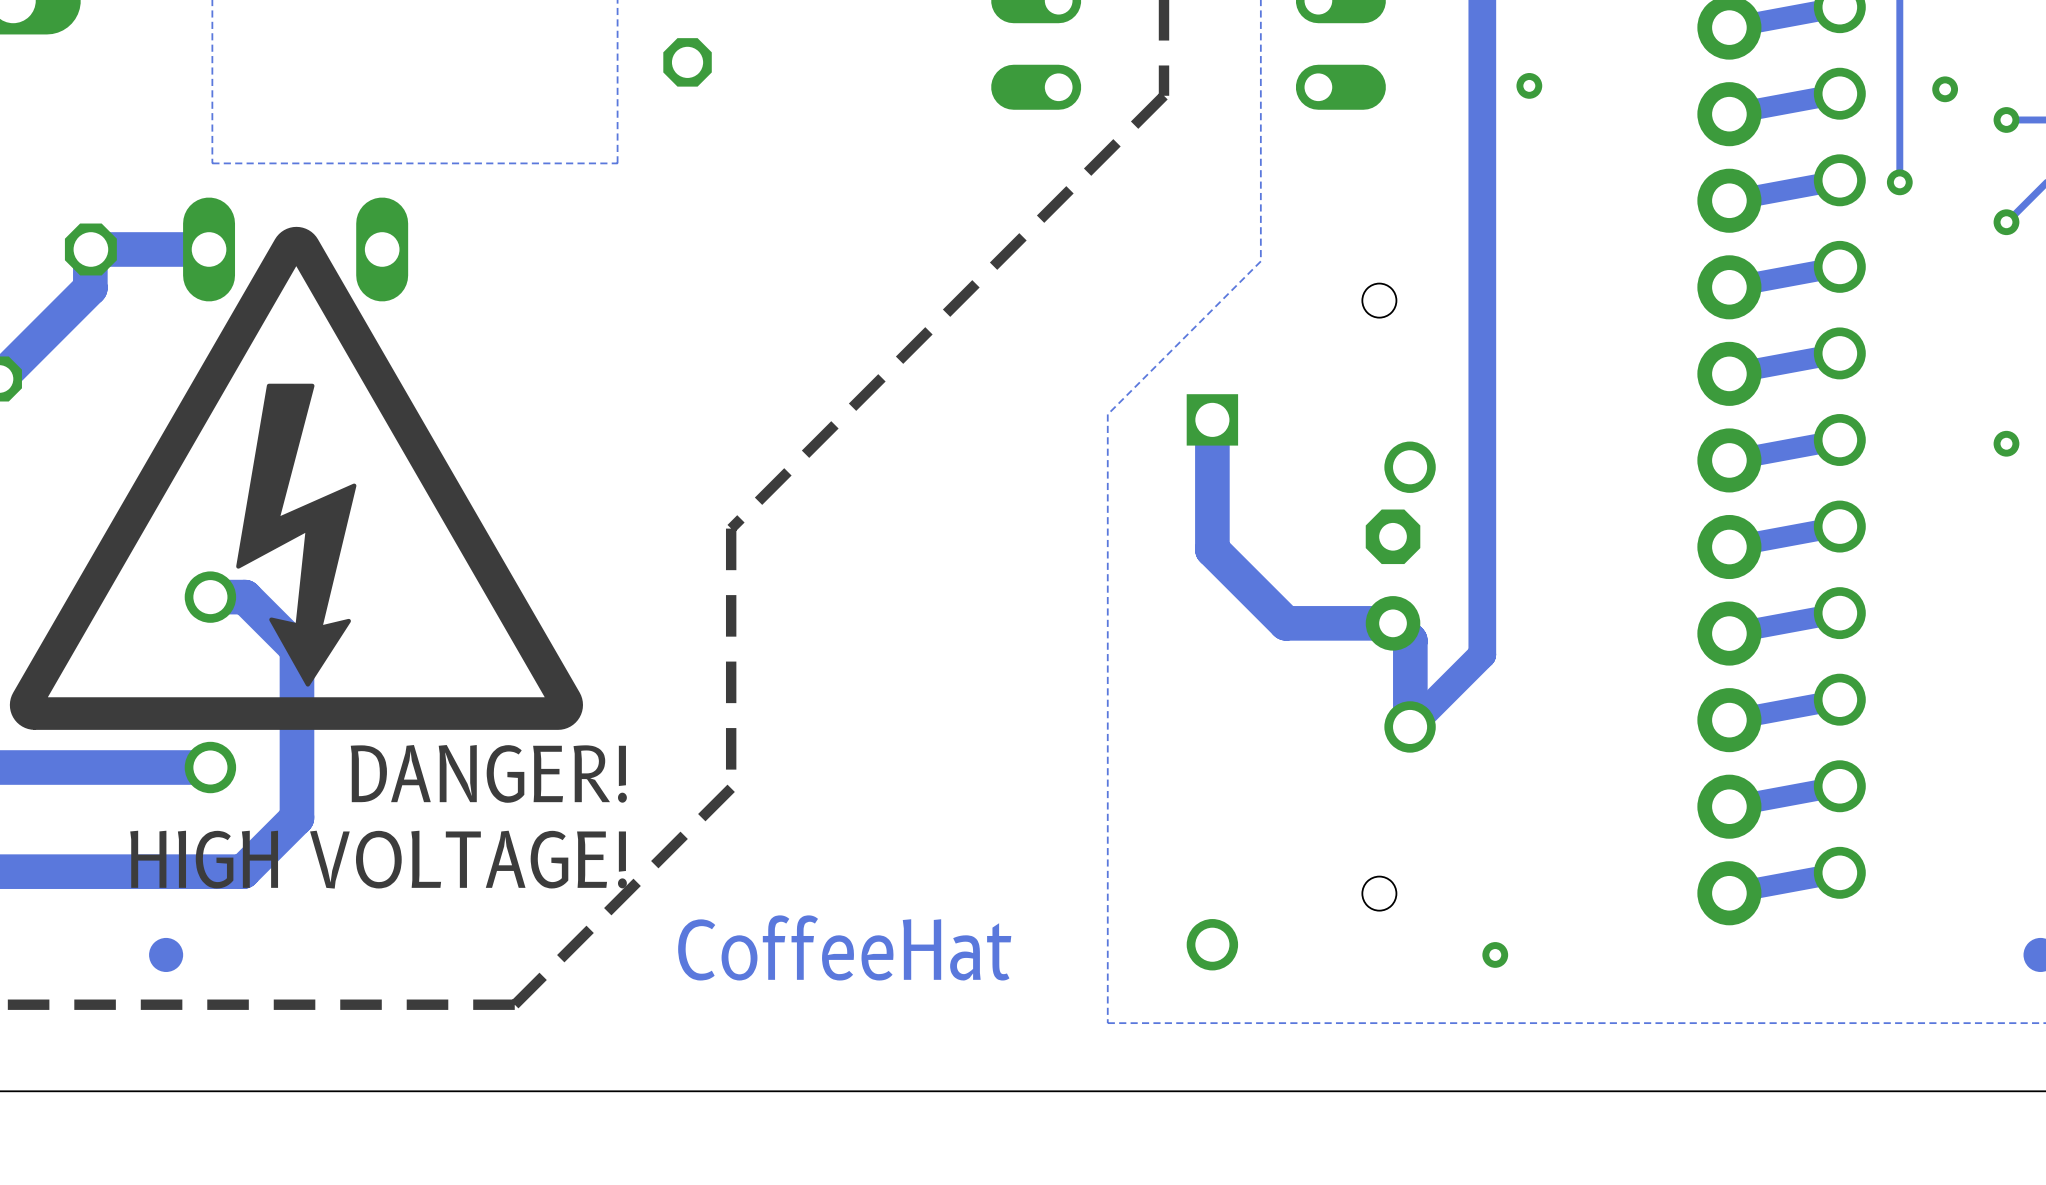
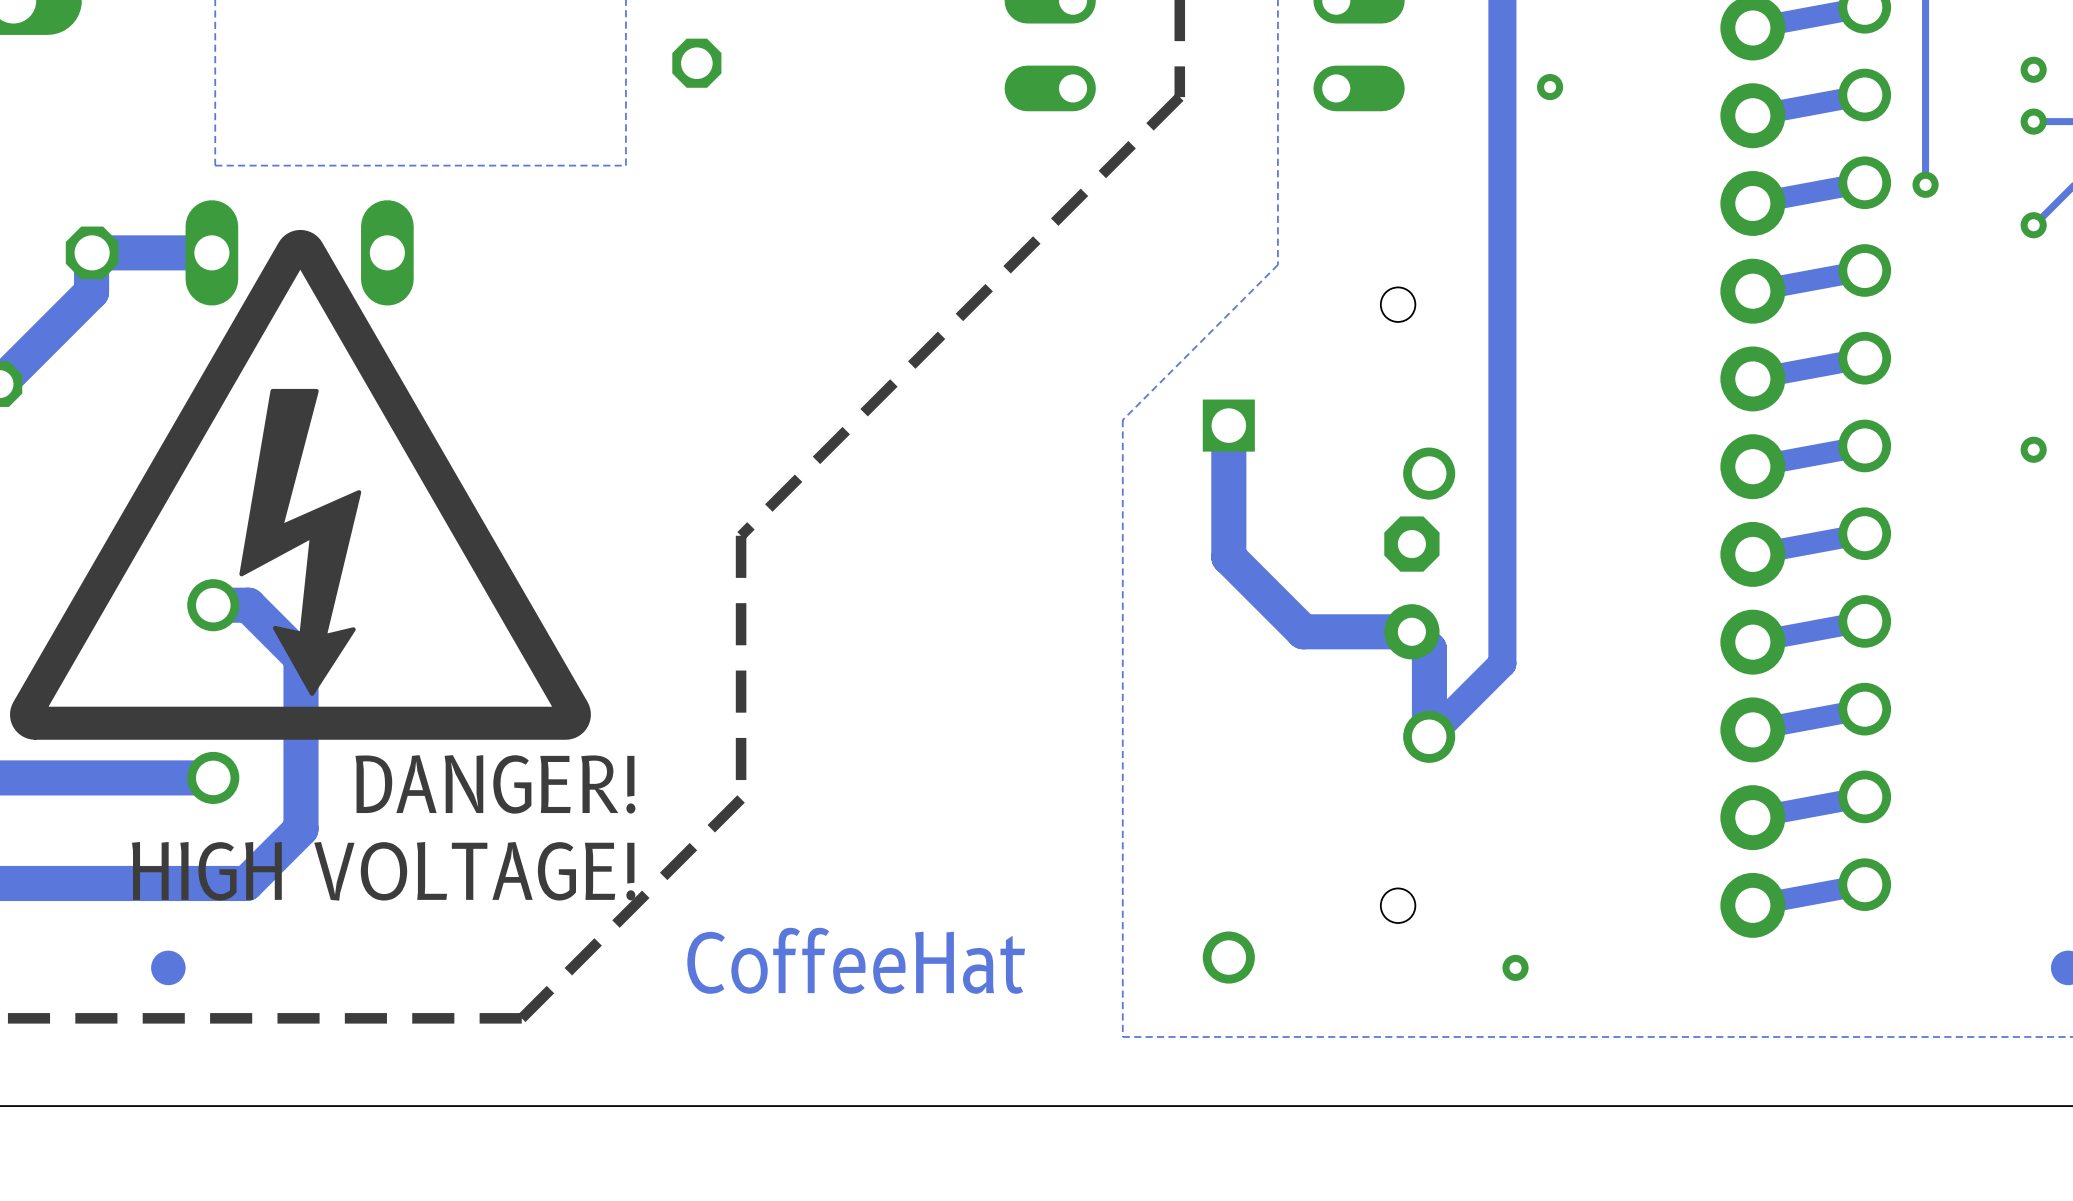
via position: (1945, 89) -> (2033, 69)

